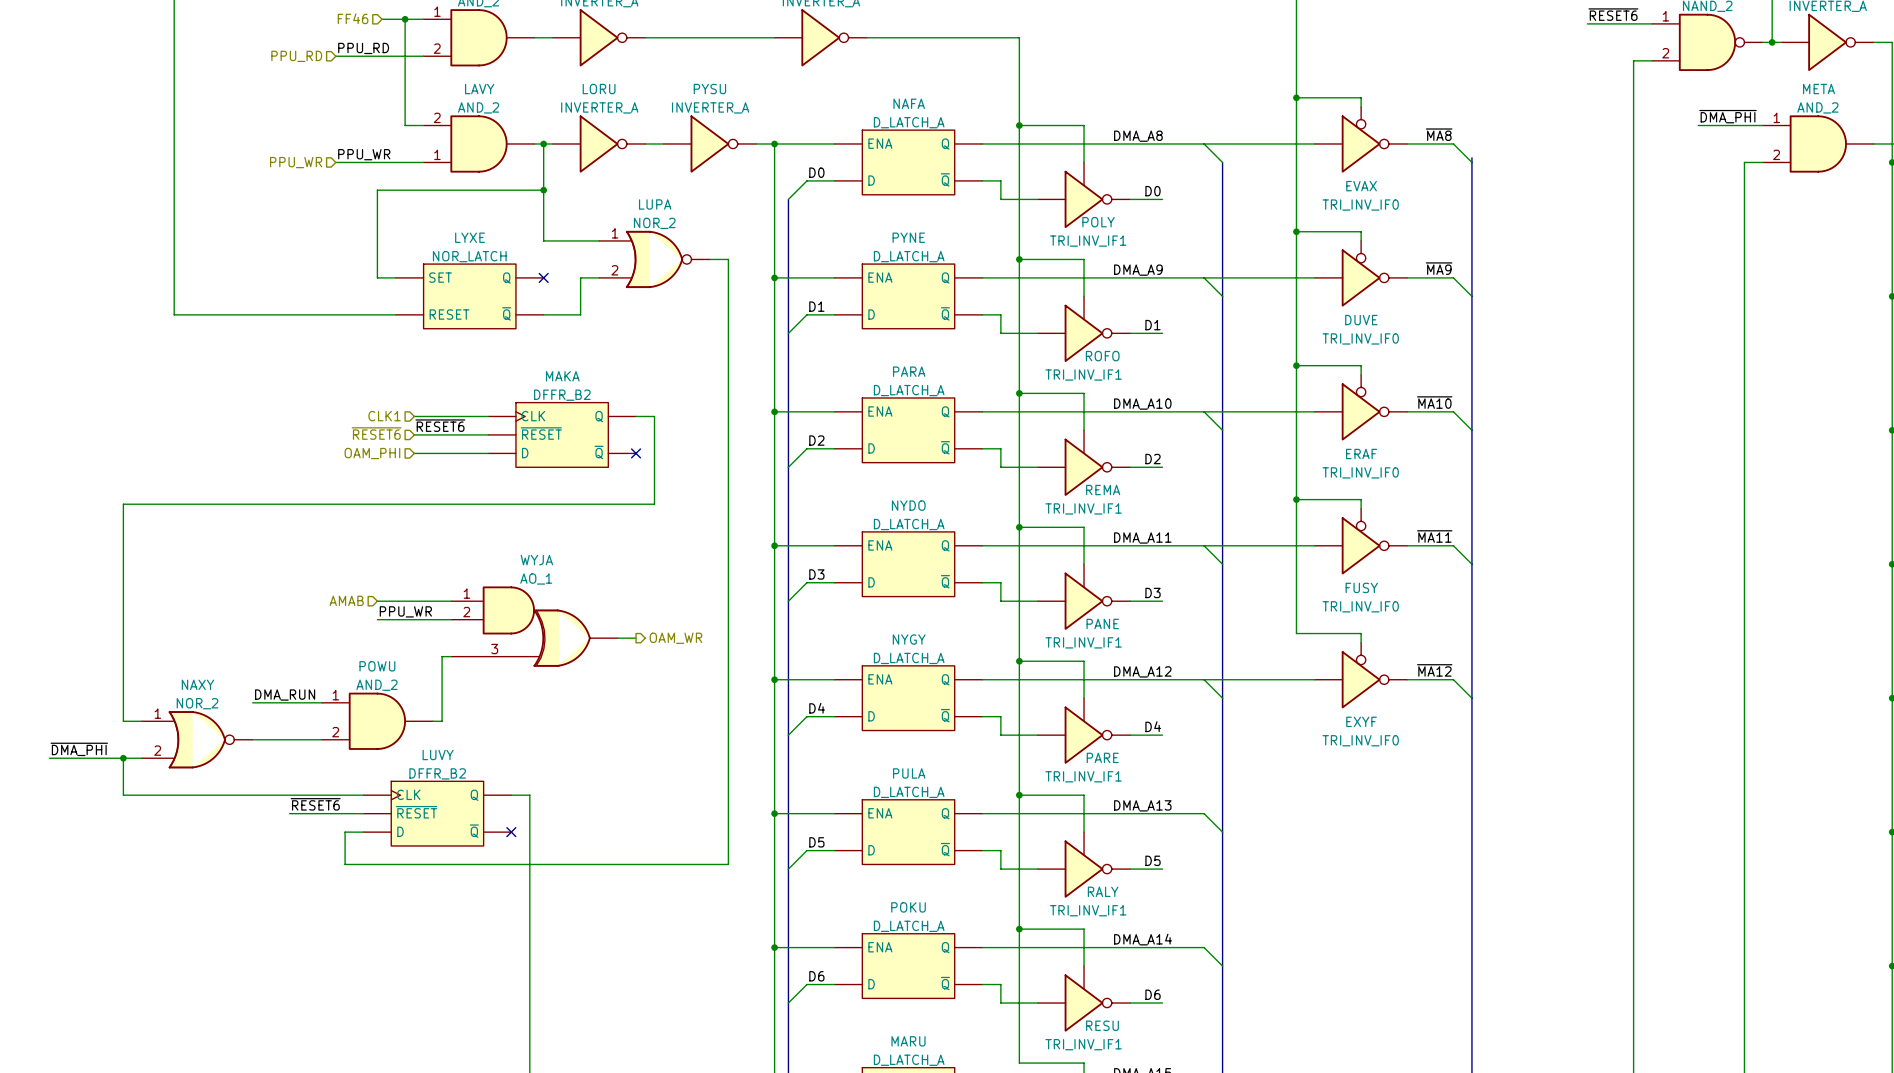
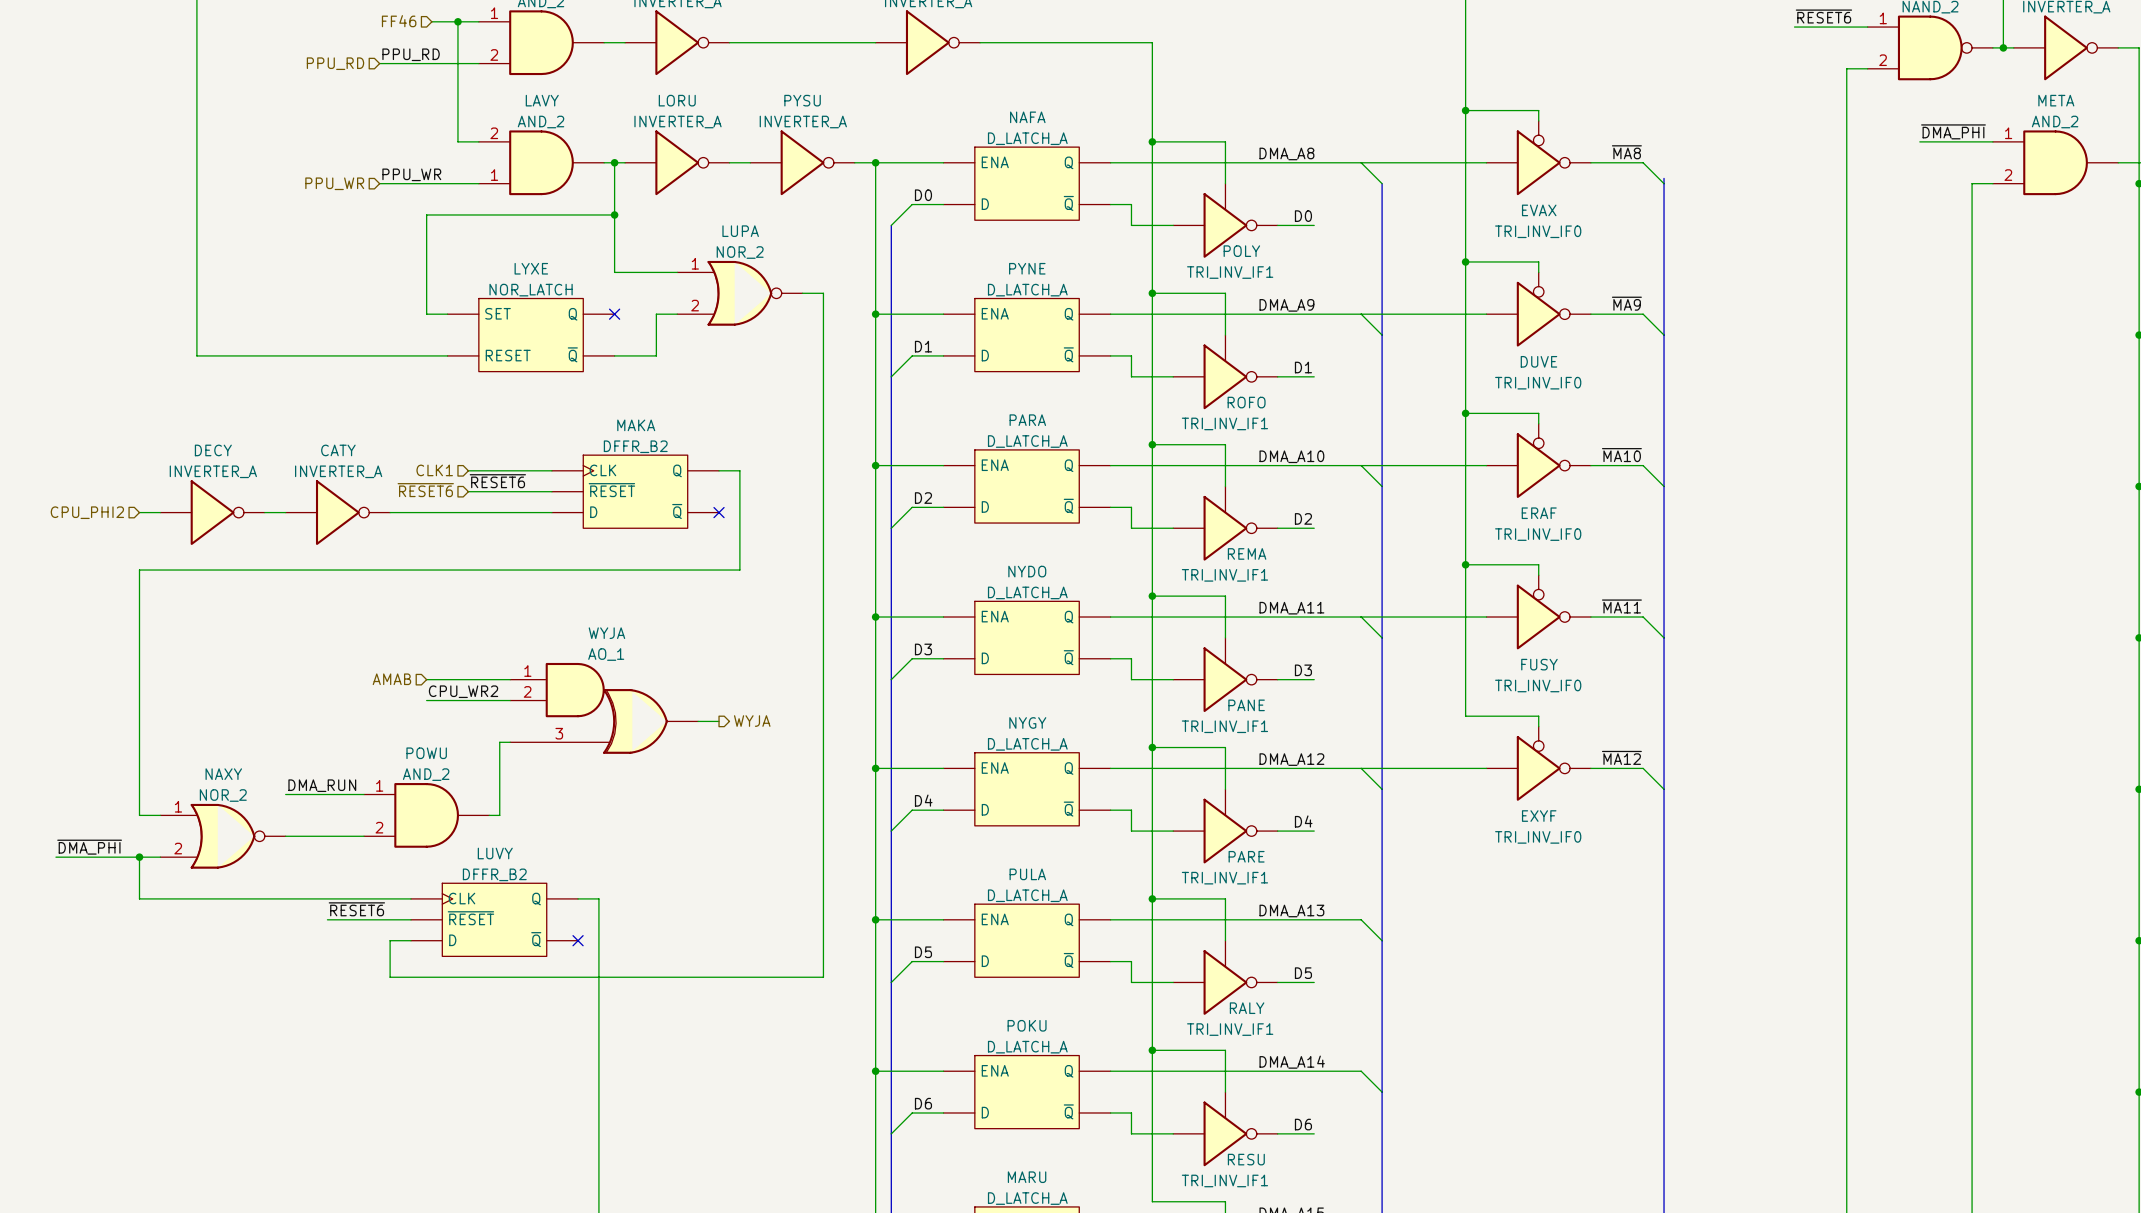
hierarchical label: none -> CPU_PHI2 (87, 512)
wire: none -> (139, 512) (160, 512)
DECY: none -> INVERTER_A (212, 512)
wire: none -> (264, 512) (285, 512)
CATY: none -> INVERTER_A (337, 512)
wire: none -> (390, 512) (468, 512)
hierarchical label: OAM_PHI (372, 453) -> none
label: PPU_WR (405, 611) -> CPU_WR2 (463, 691)
hierarchical label: OAM_WR (675, 638) -> WYJA (752, 721)

